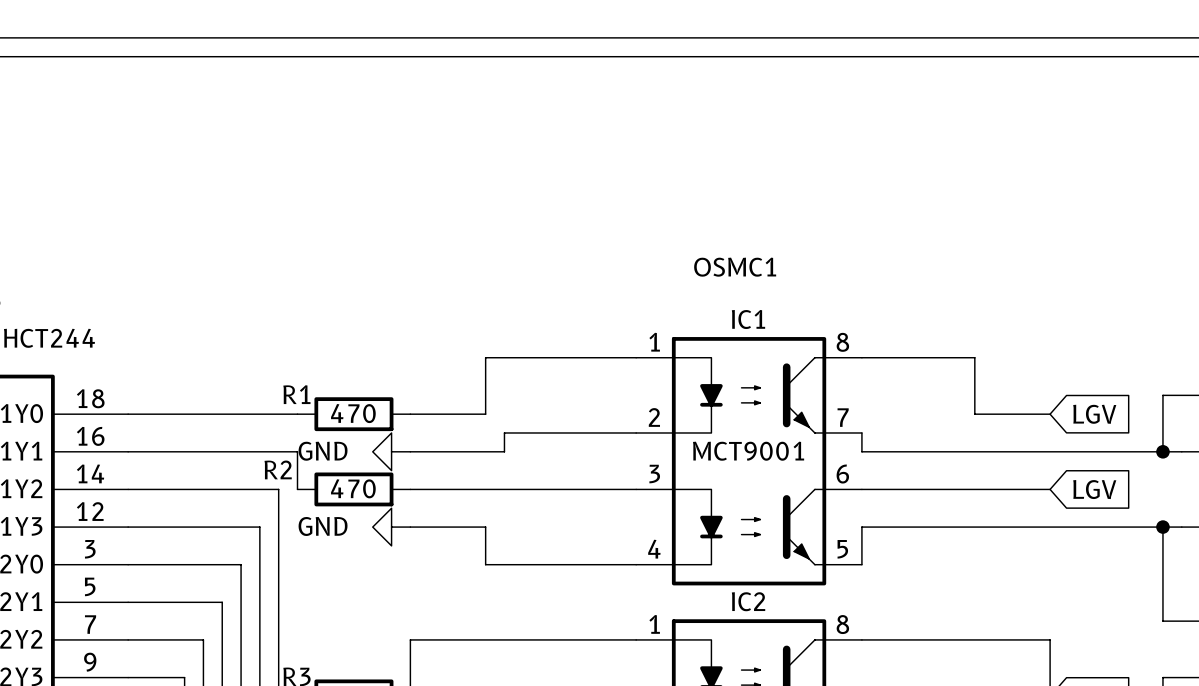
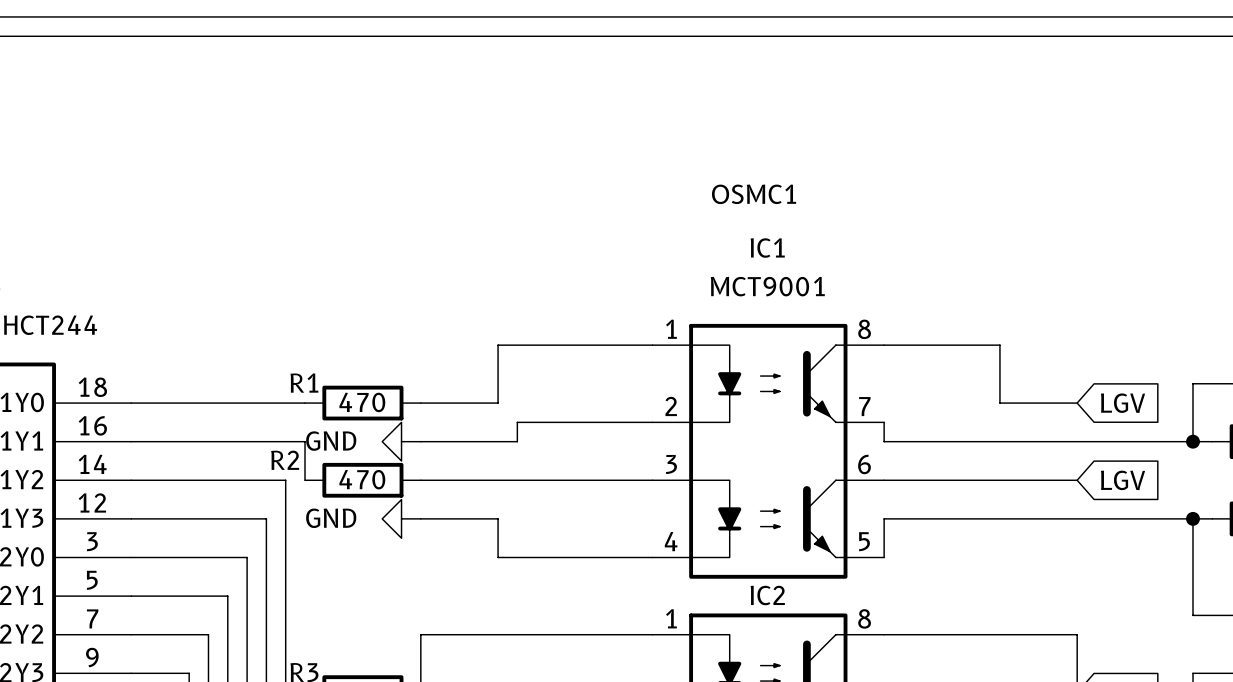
text position: OSMC1 (735, 267) -> OSMC1 (754, 194)
IC1 name position: IC1 (748, 319) -> IC1 (767, 248)
IC1 value position: MCT9001 (748, 451) -> MCT9001 (767, 286)

